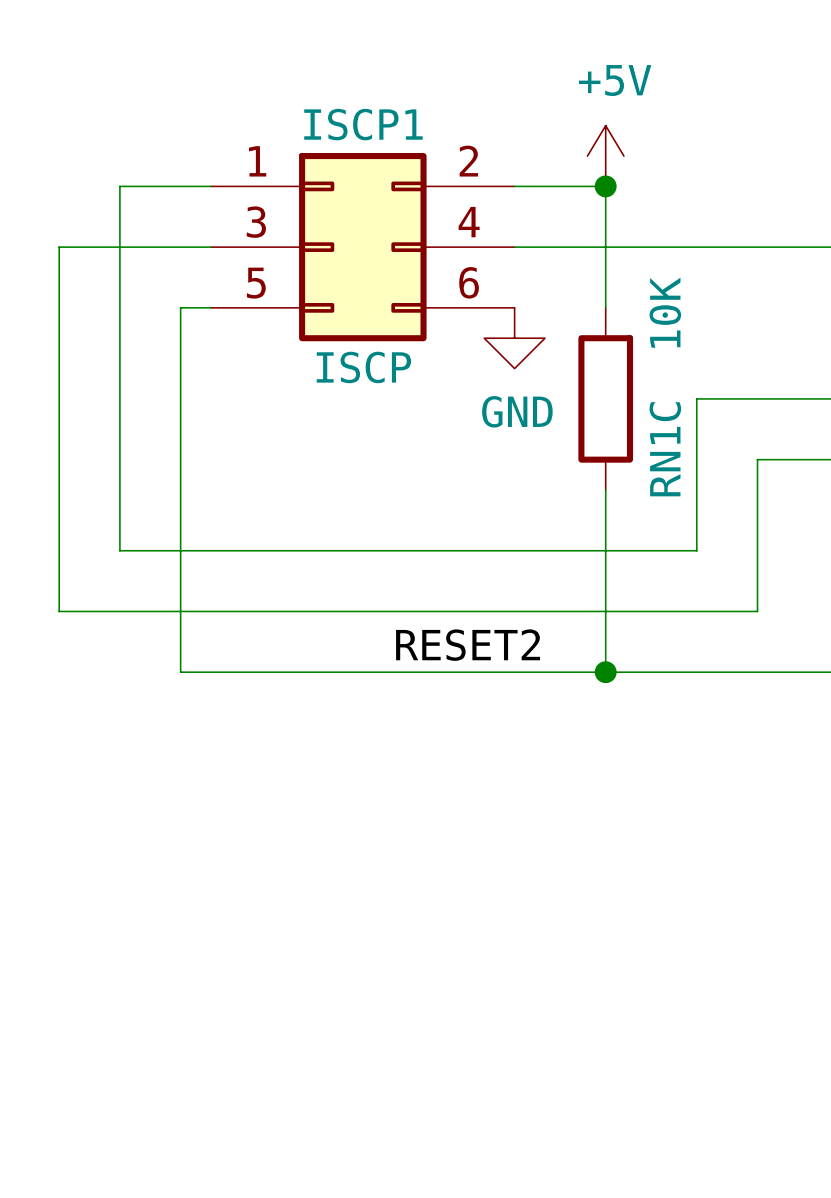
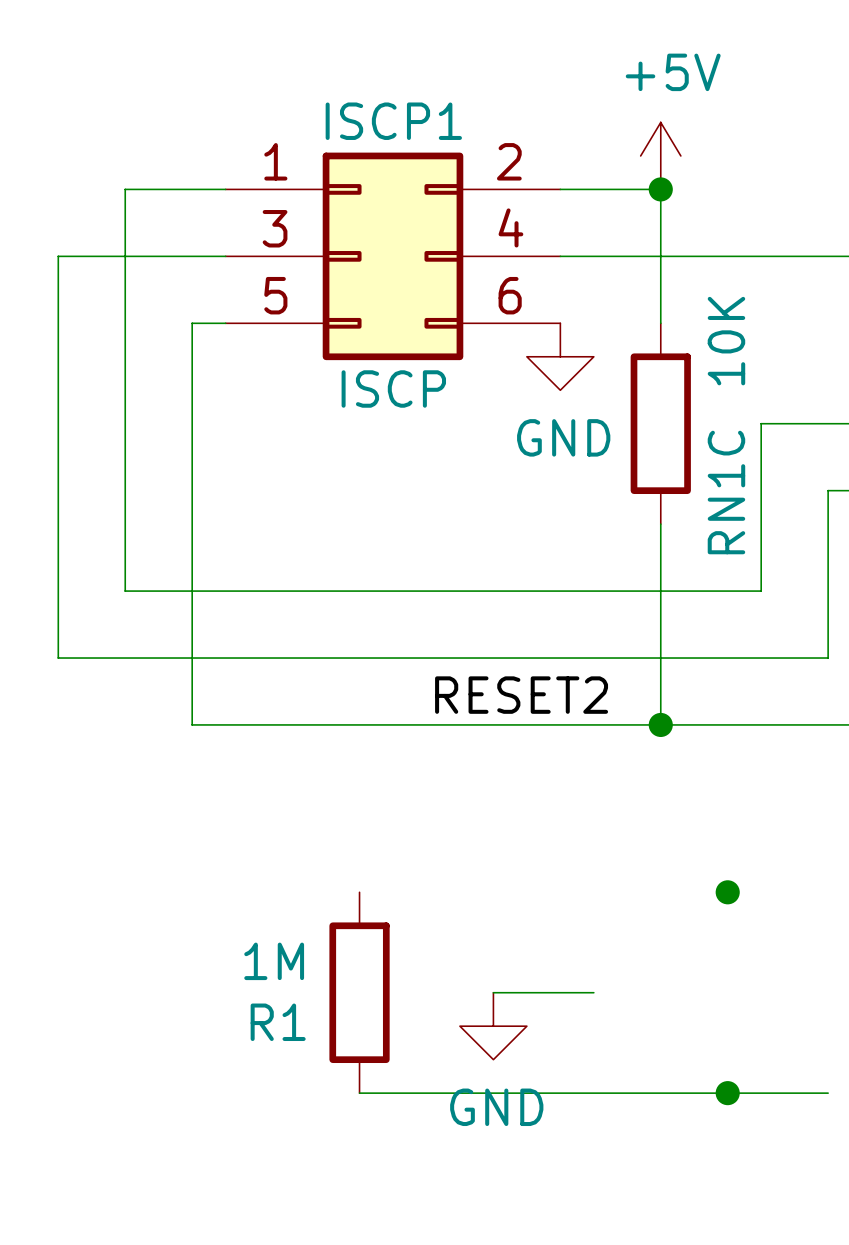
junction: none -> (727, 892)
R1: none -> 1M (359, 992)
wire: none -> (493, 992) (593, 992)
power symbol: none -> GND (493, 1026)
wire: none -> (359, 1093) (828, 1093)
junction: none -> (727, 1093)

